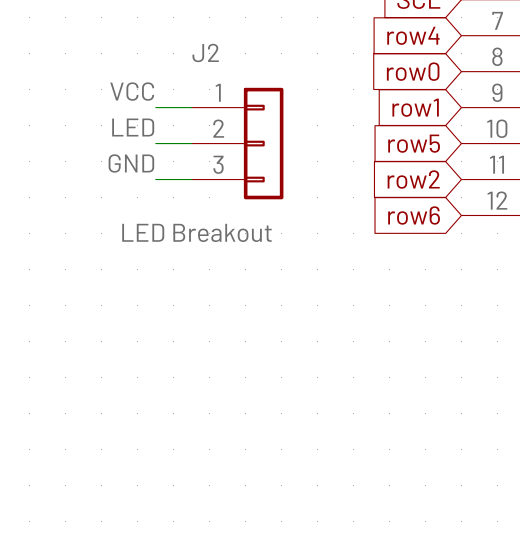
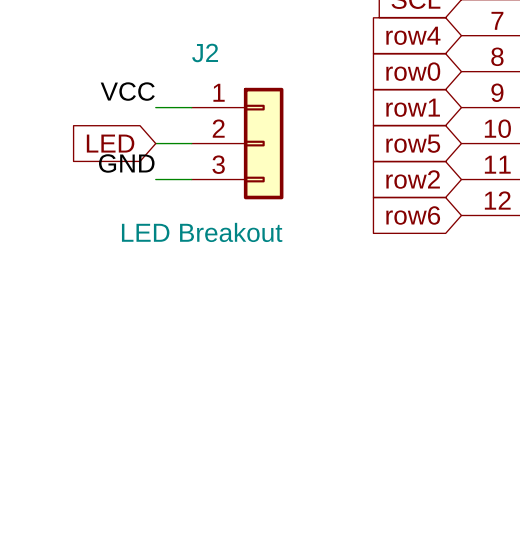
label: LED (133, 127) -> none
global label: none -> LED (110, 143)

